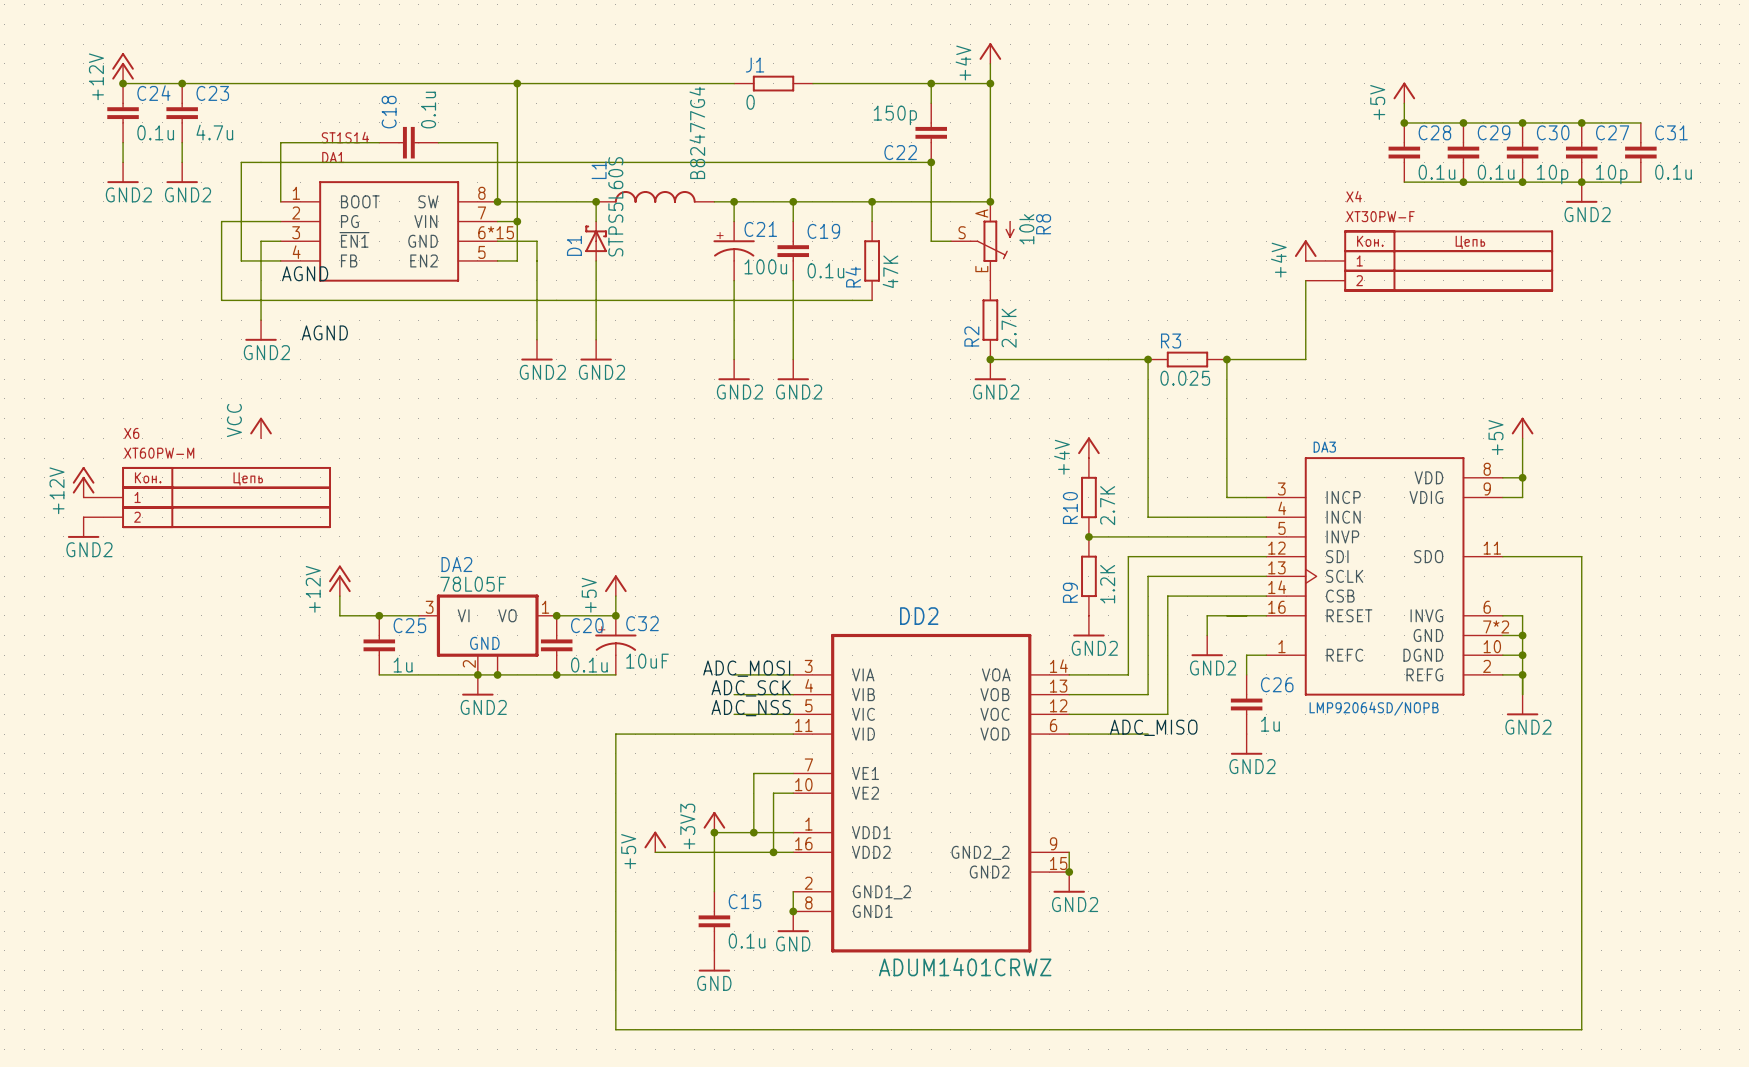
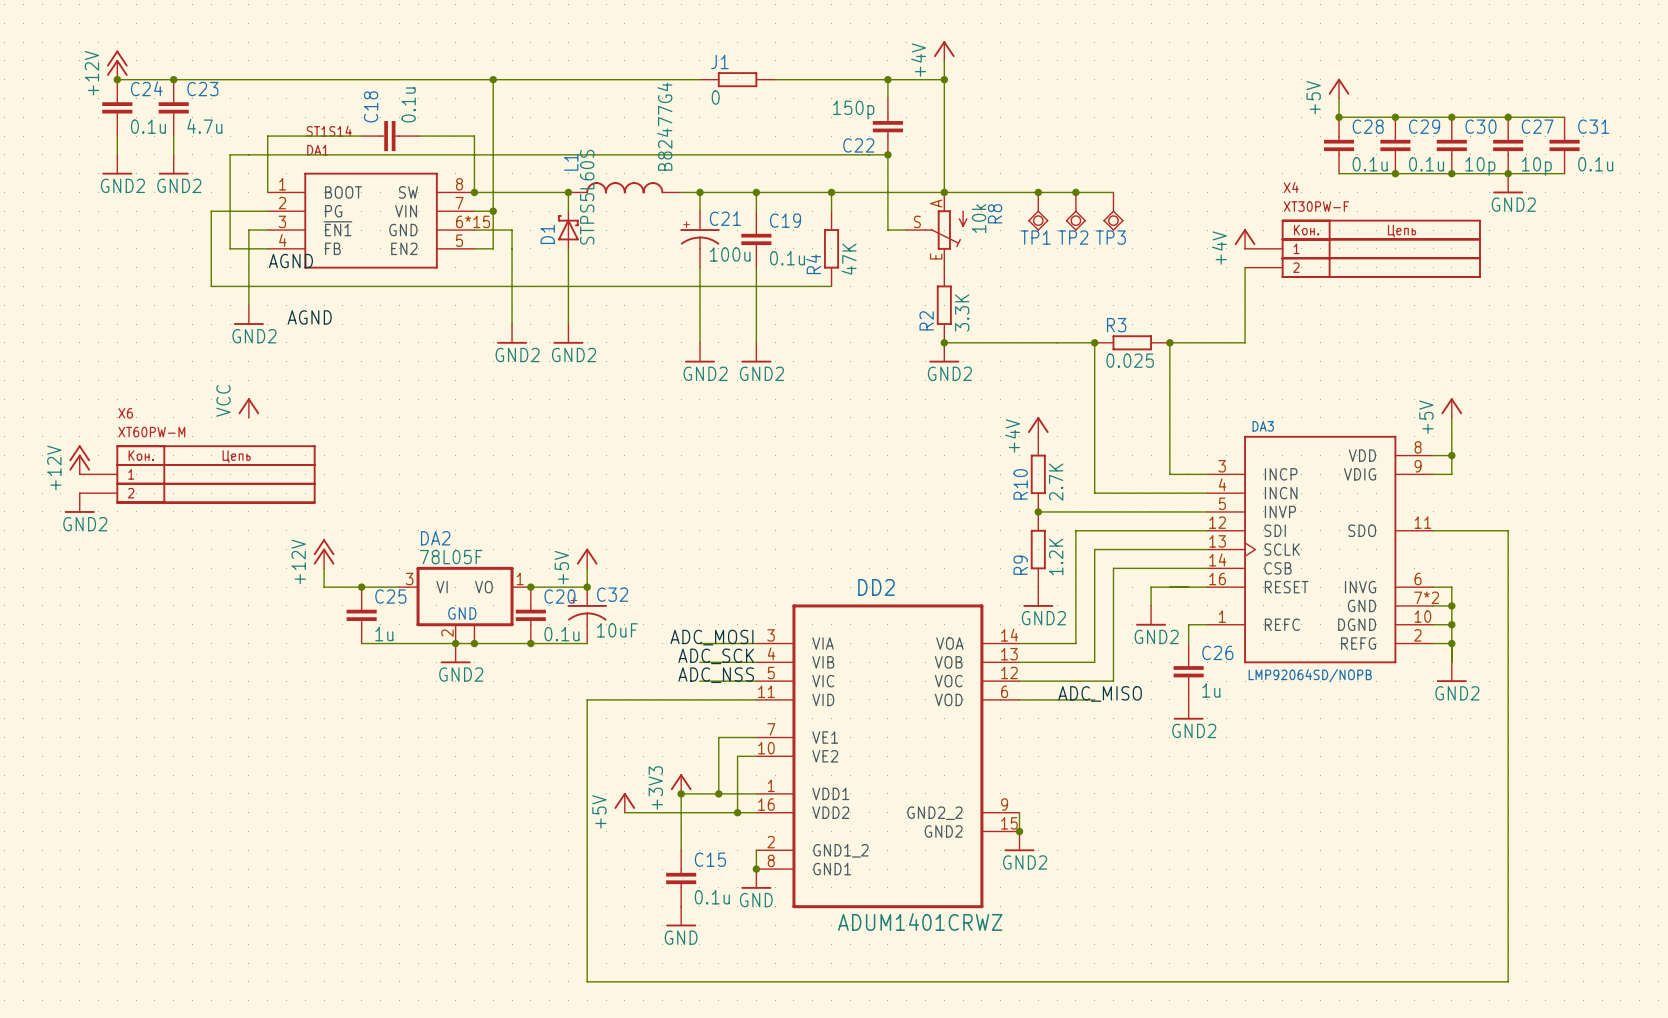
wire: none -> (944, 192) (1113, 192)
junction: none -> (1038, 192)
junction: none -> (1075, 192)
TP1: none -> (1038, 211)
TP2: none -> (1075, 211)
TP3: none -> (1113, 211)
R2 value: 2.7K (1009, 328) -> 3.3K (962, 312)

